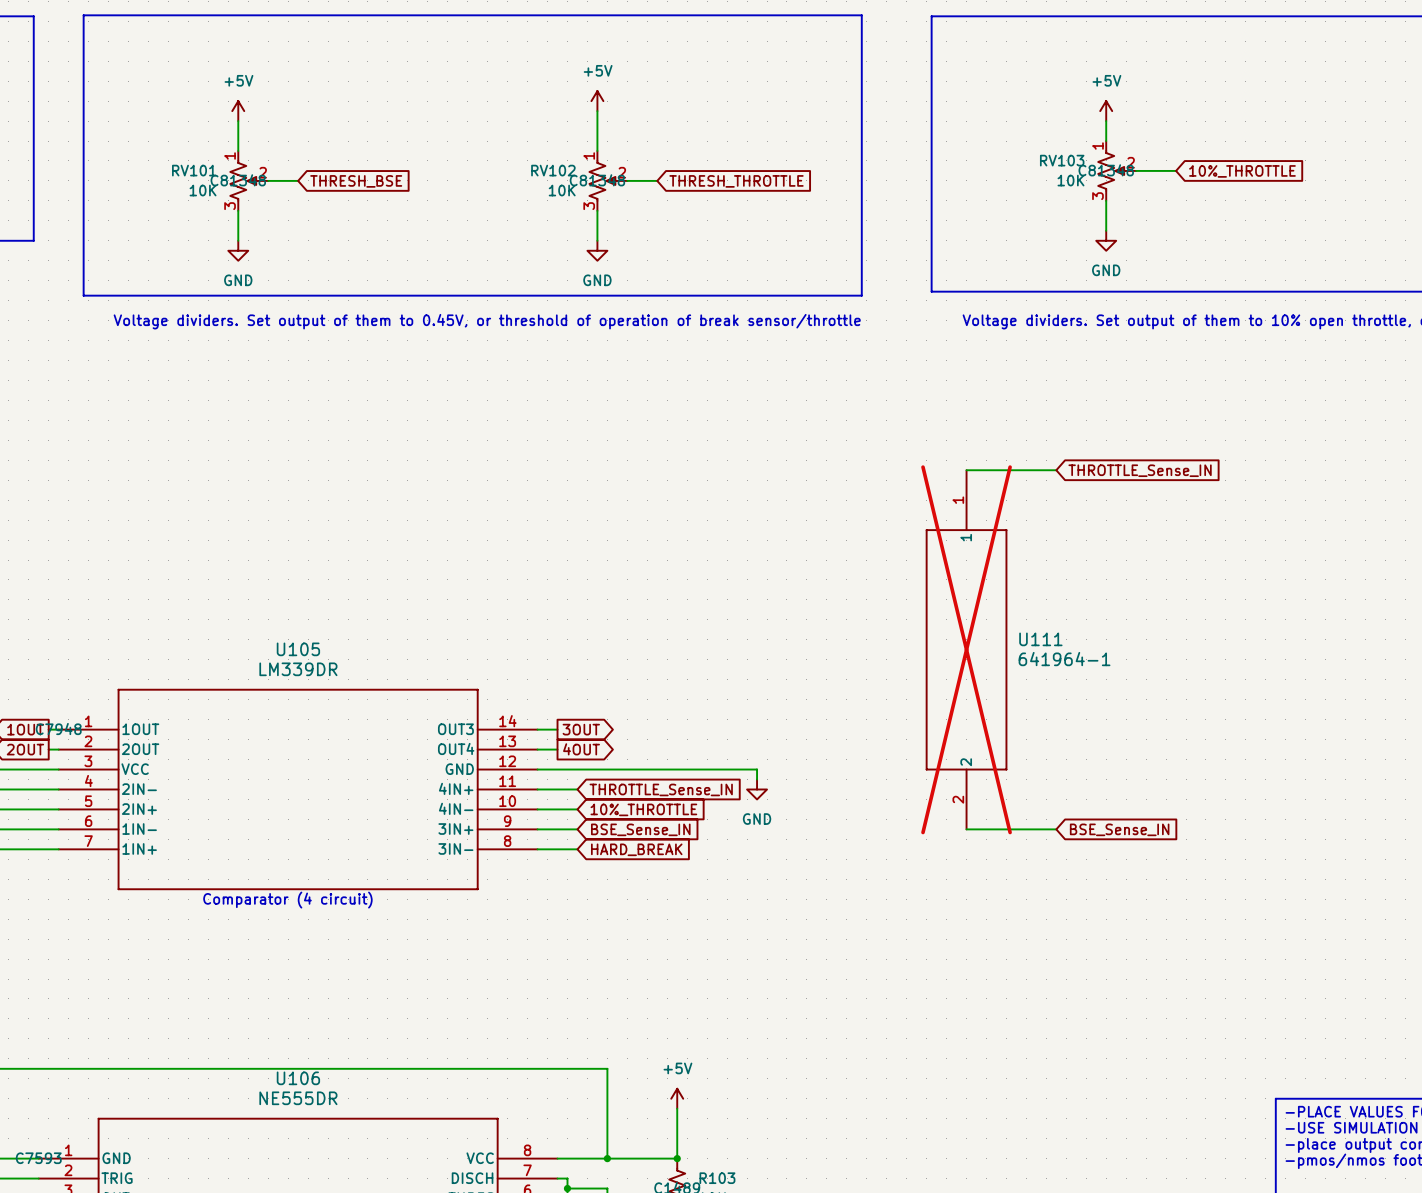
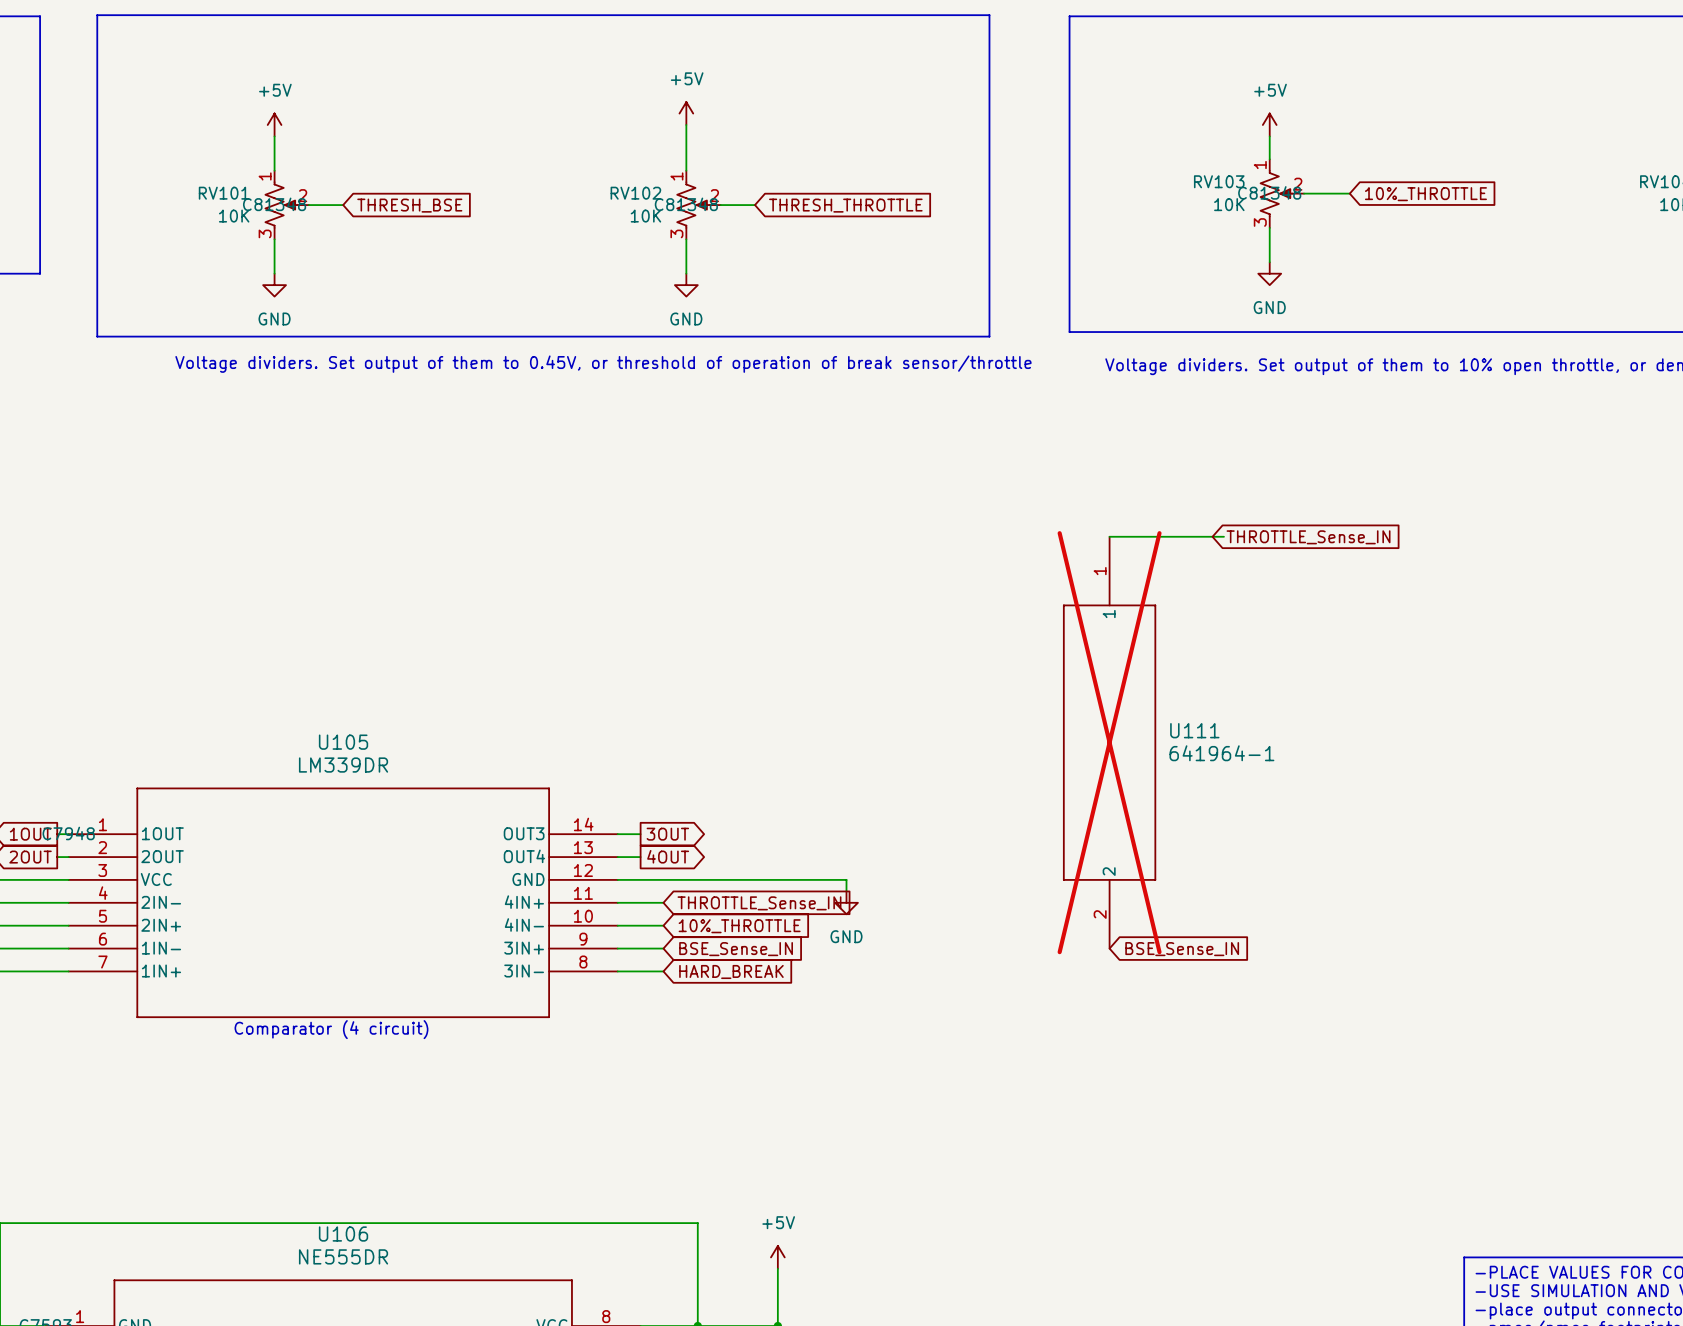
text position: Voltage dividers. Set output of them to 0.45V, or threshold of operation of break sensor/throttle (487, 321) -> Voltage dividers. Set output of them to 0.45V, or threshold of operation of break sensor/throttle (603, 364)
wire: none -> (1212, 536) (1223, 536)
wire: (737, 769) (757, 769) (757, 779) -> (846, 879) (846, 891)
power symbol position: GND (757, 789) -> GND (846, 902)
wire: (966, 829) (1056, 829) -> none
global label position: BSE_Sense_IN (1119, 829) -> BSE_Sense_IN (1182, 949)

